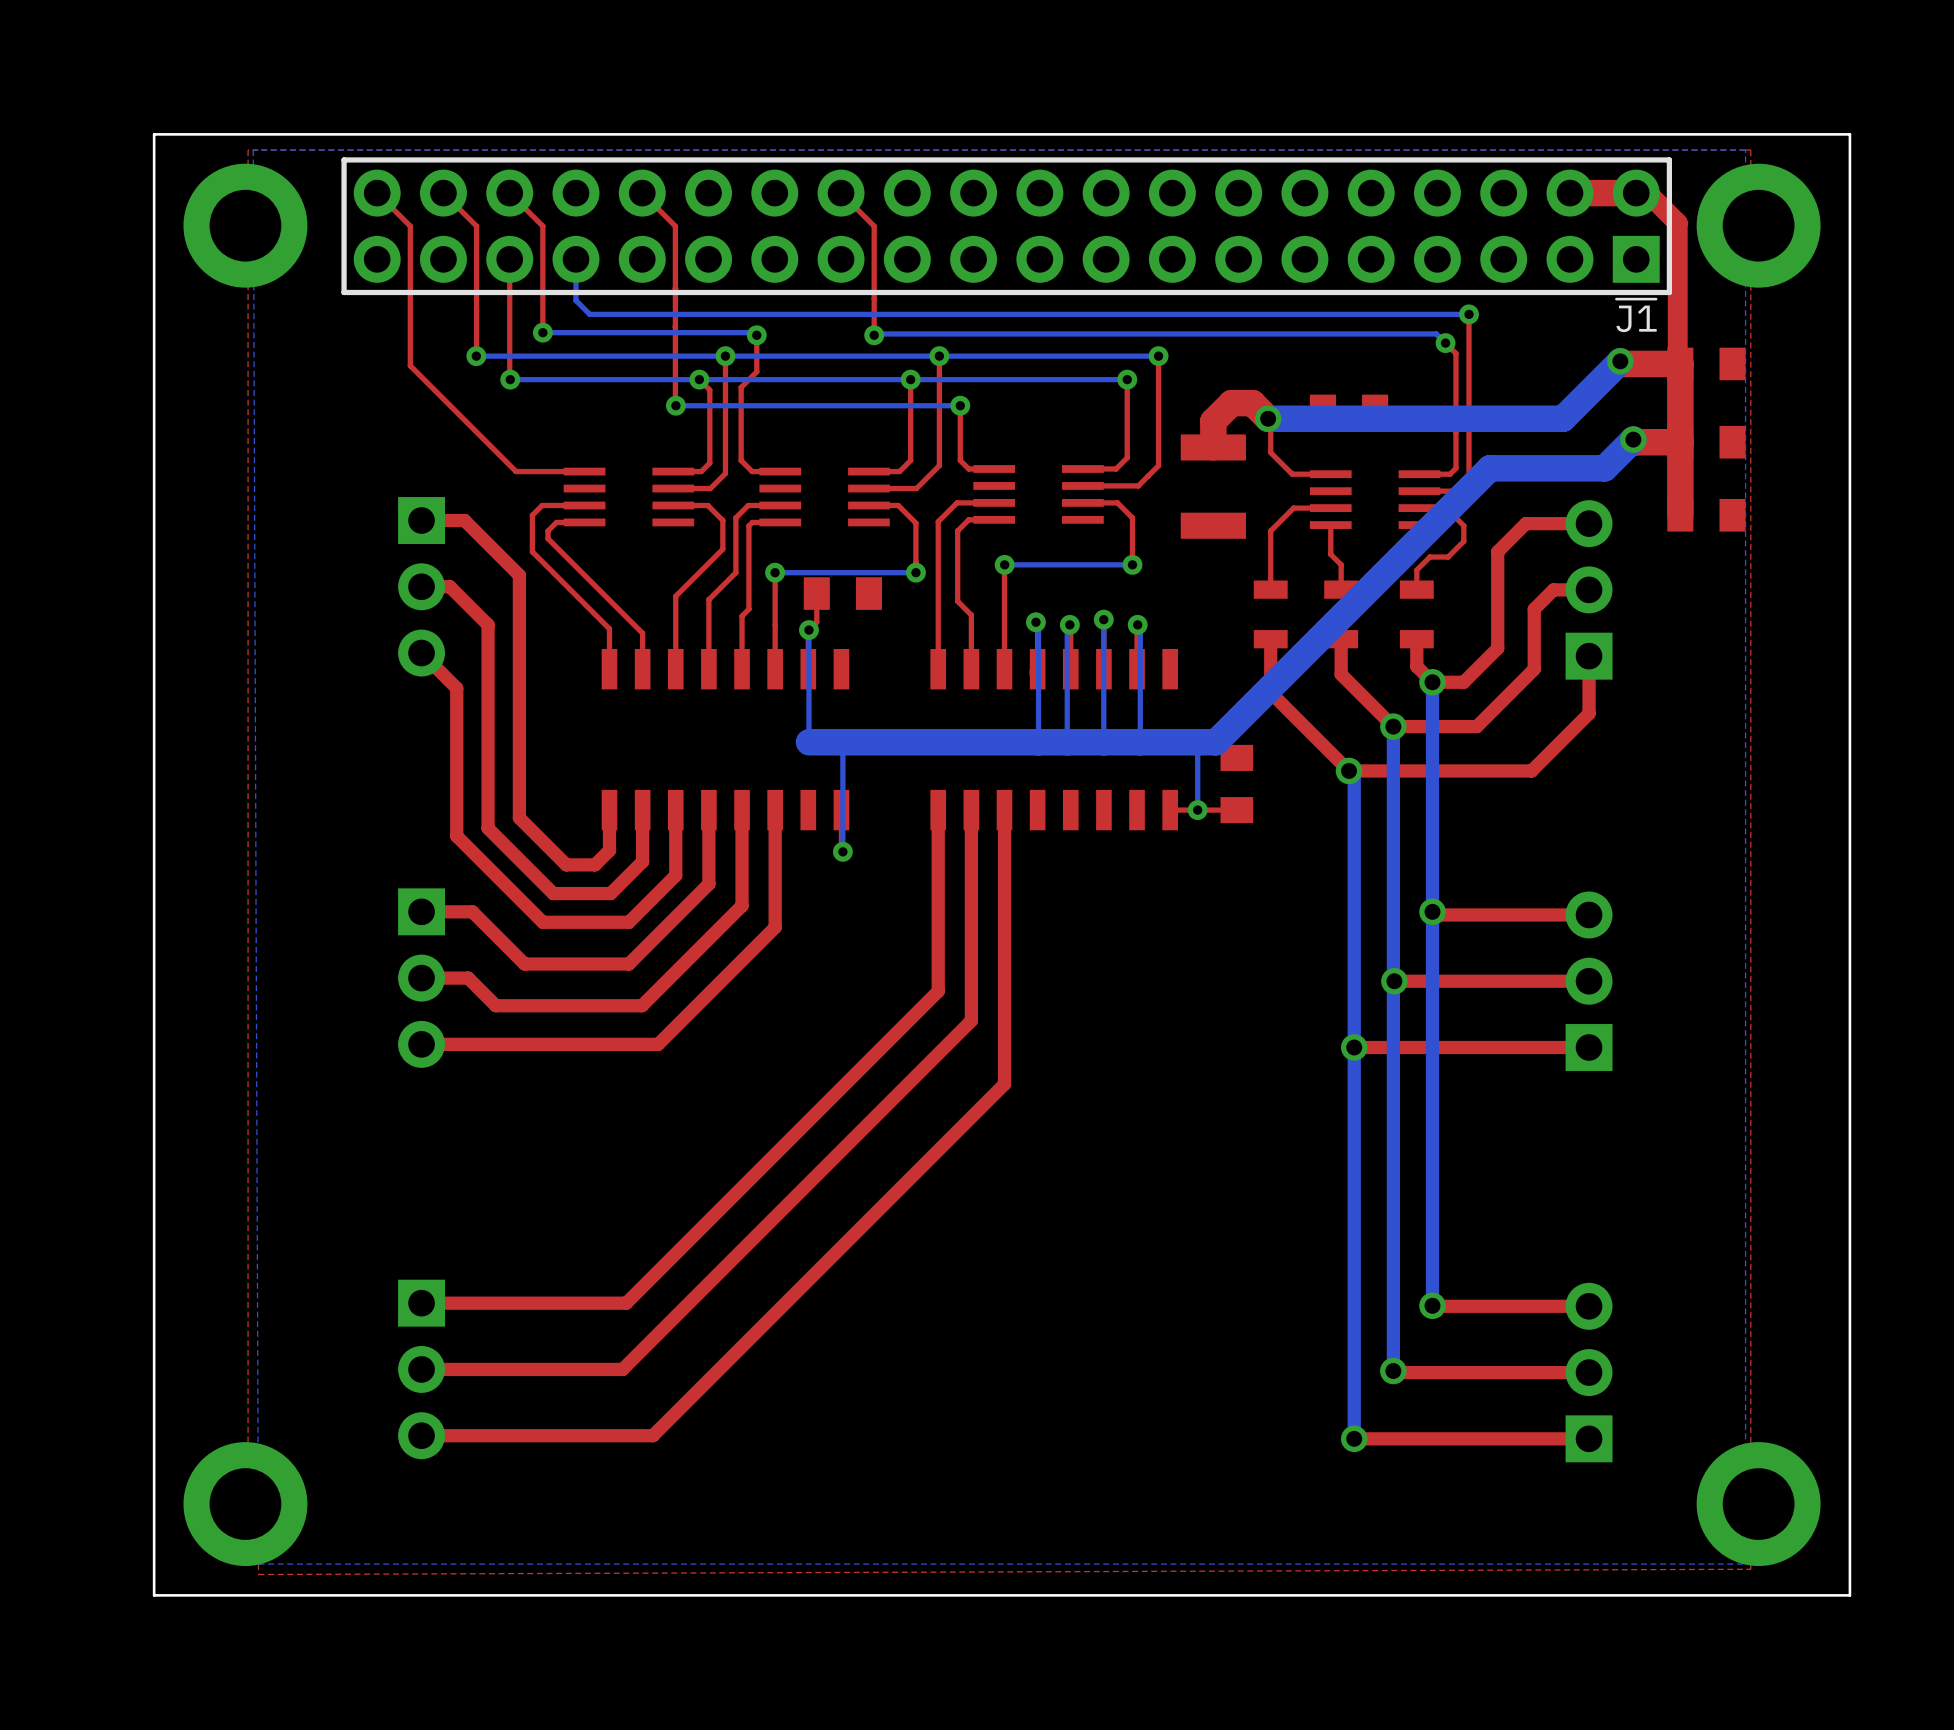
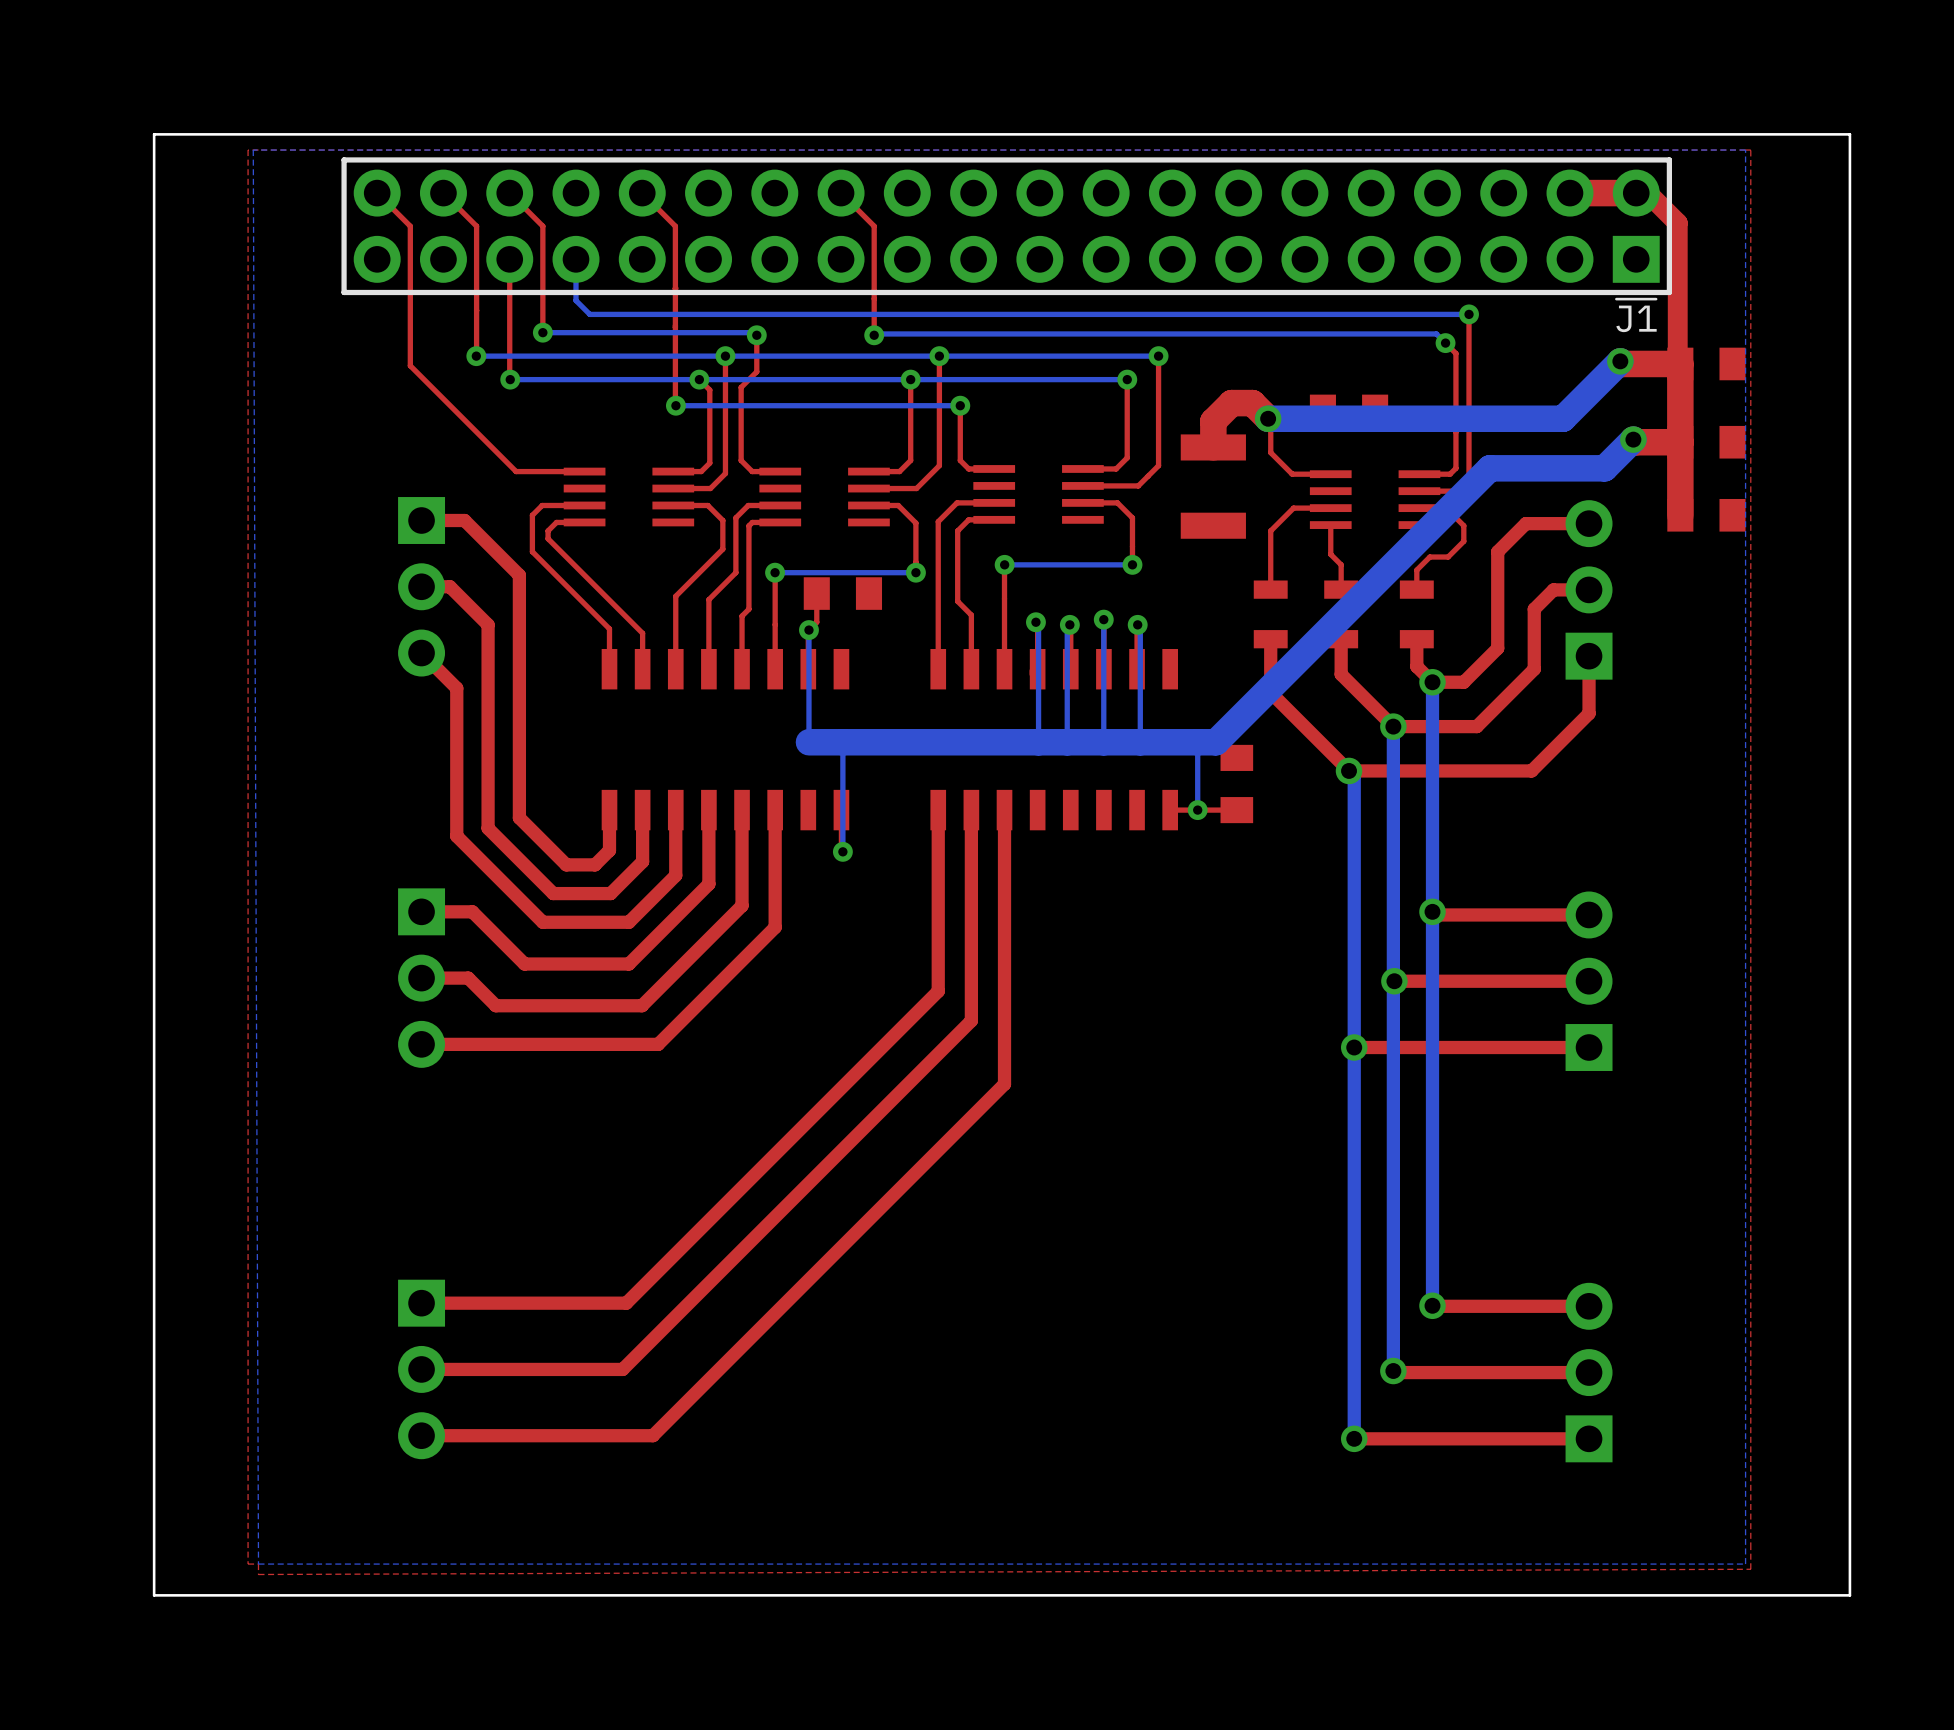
part: (245, 225) -> none
part: (1758, 225) -> none
part: (245, 1504) -> none
part: (1758, 1504) -> none

